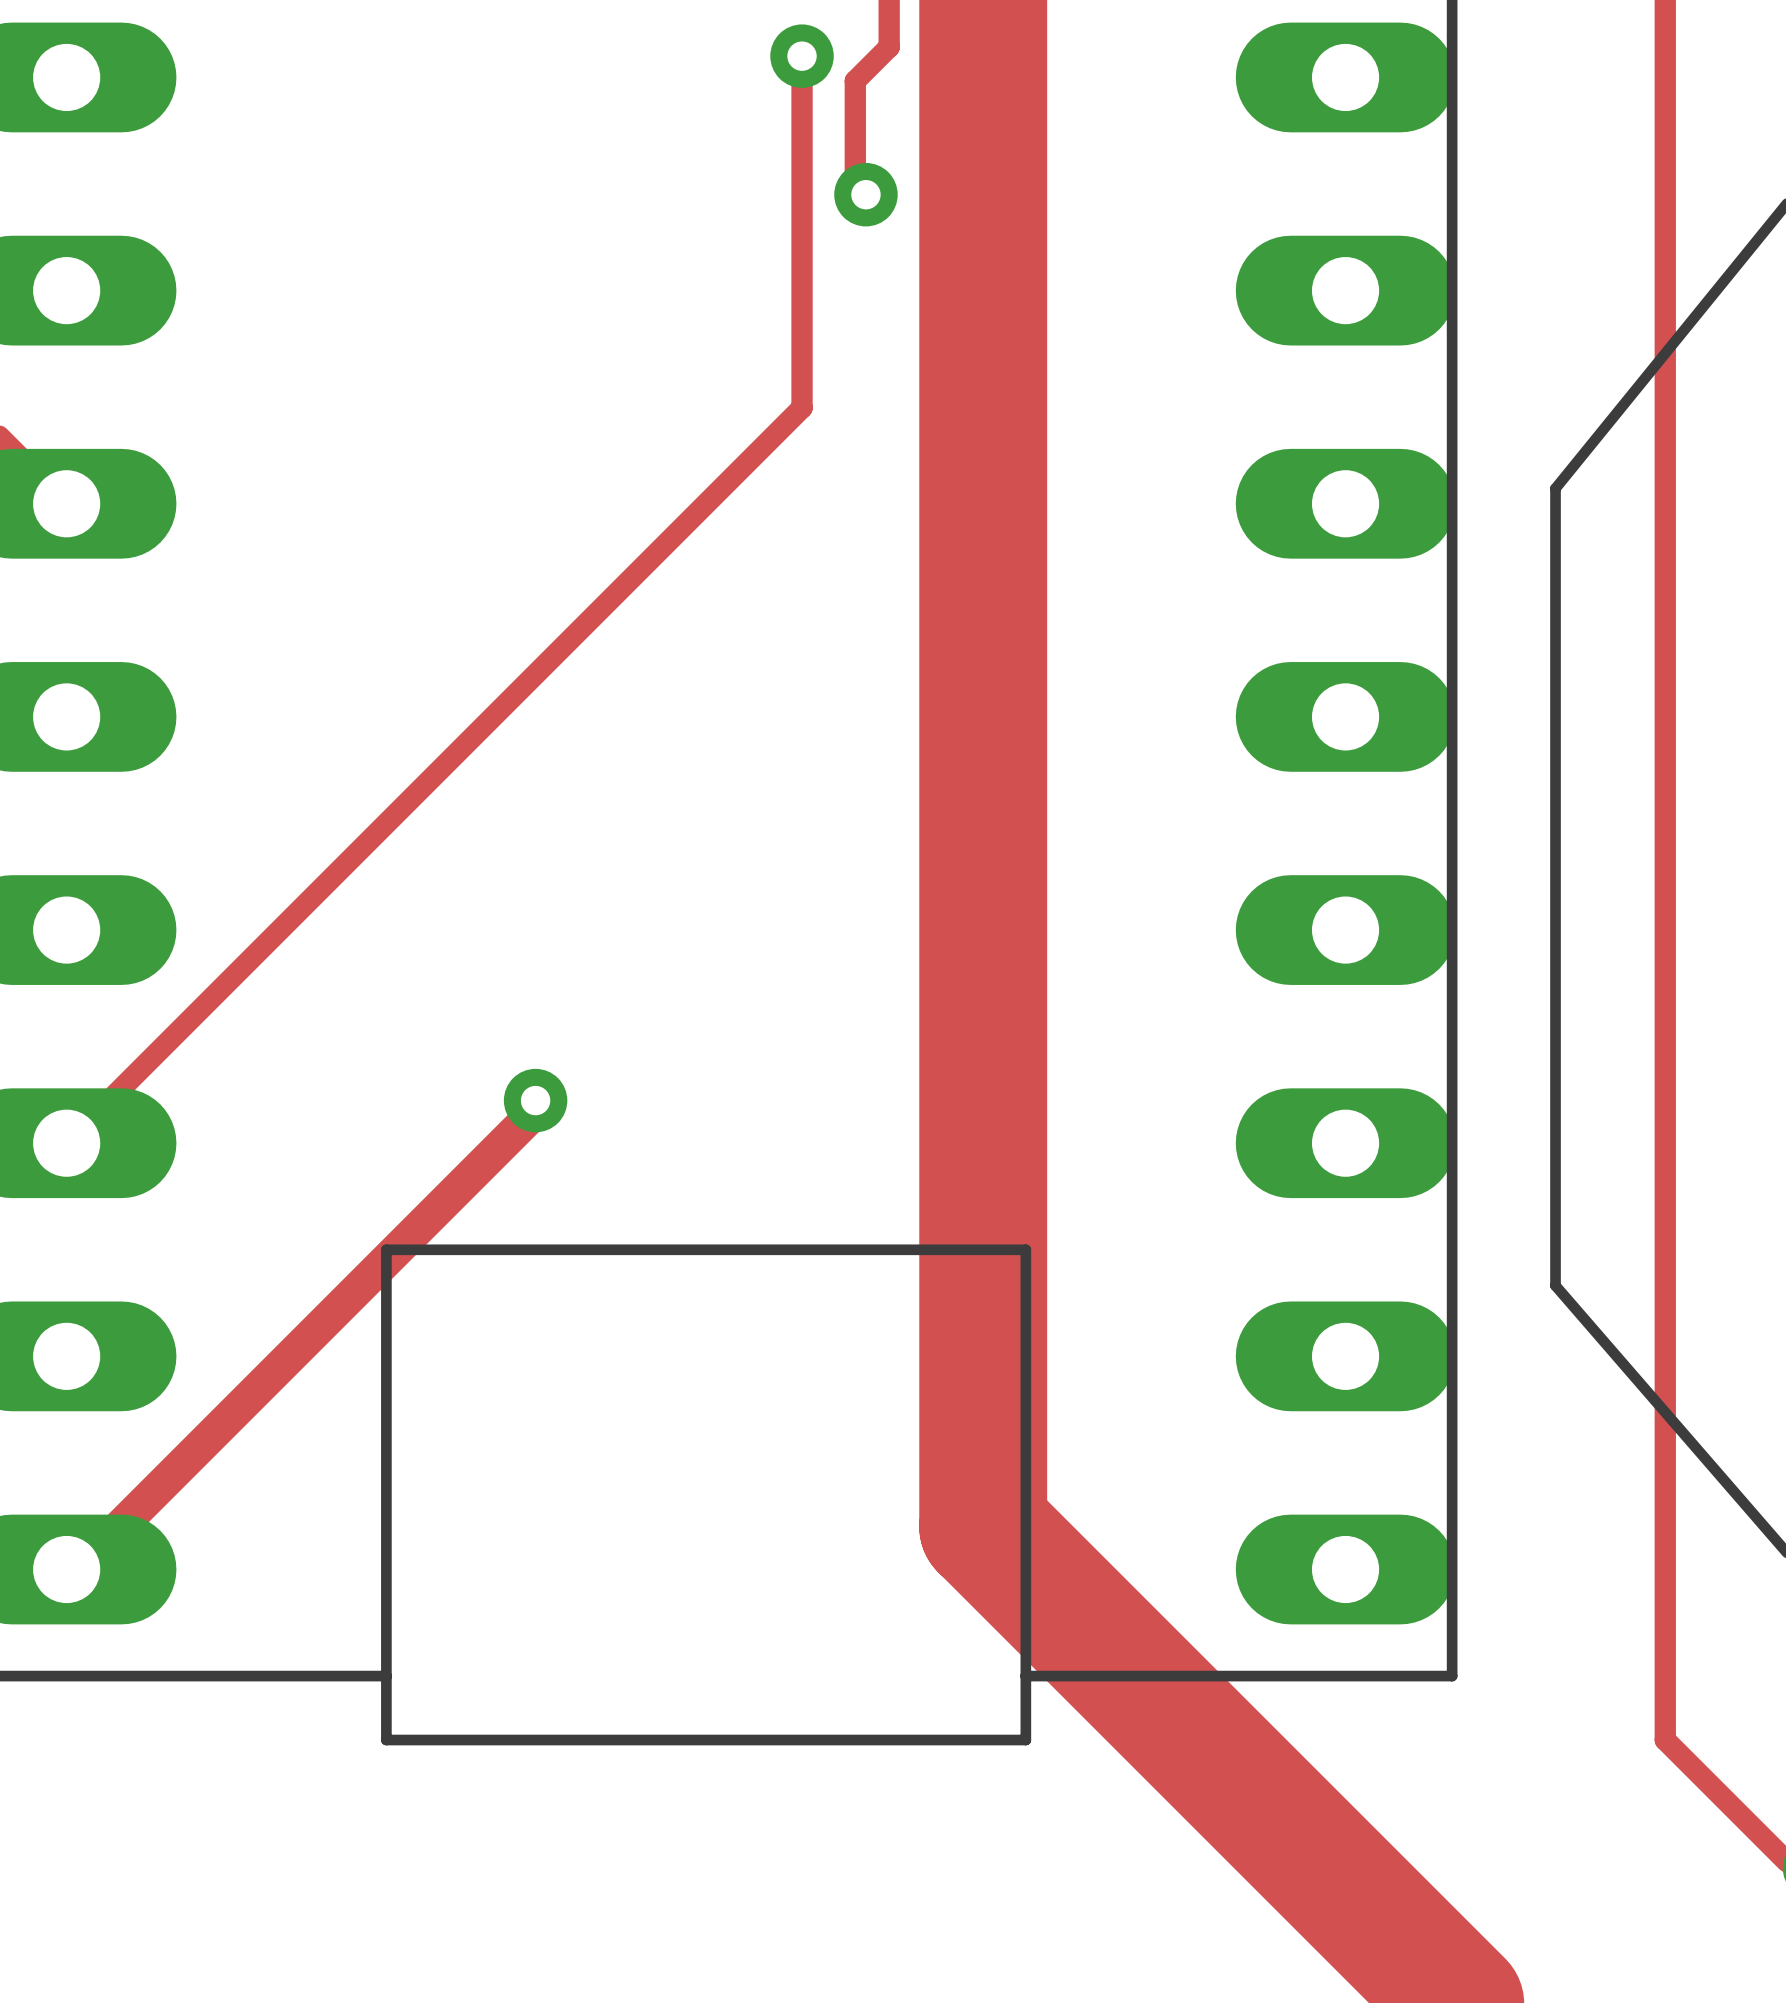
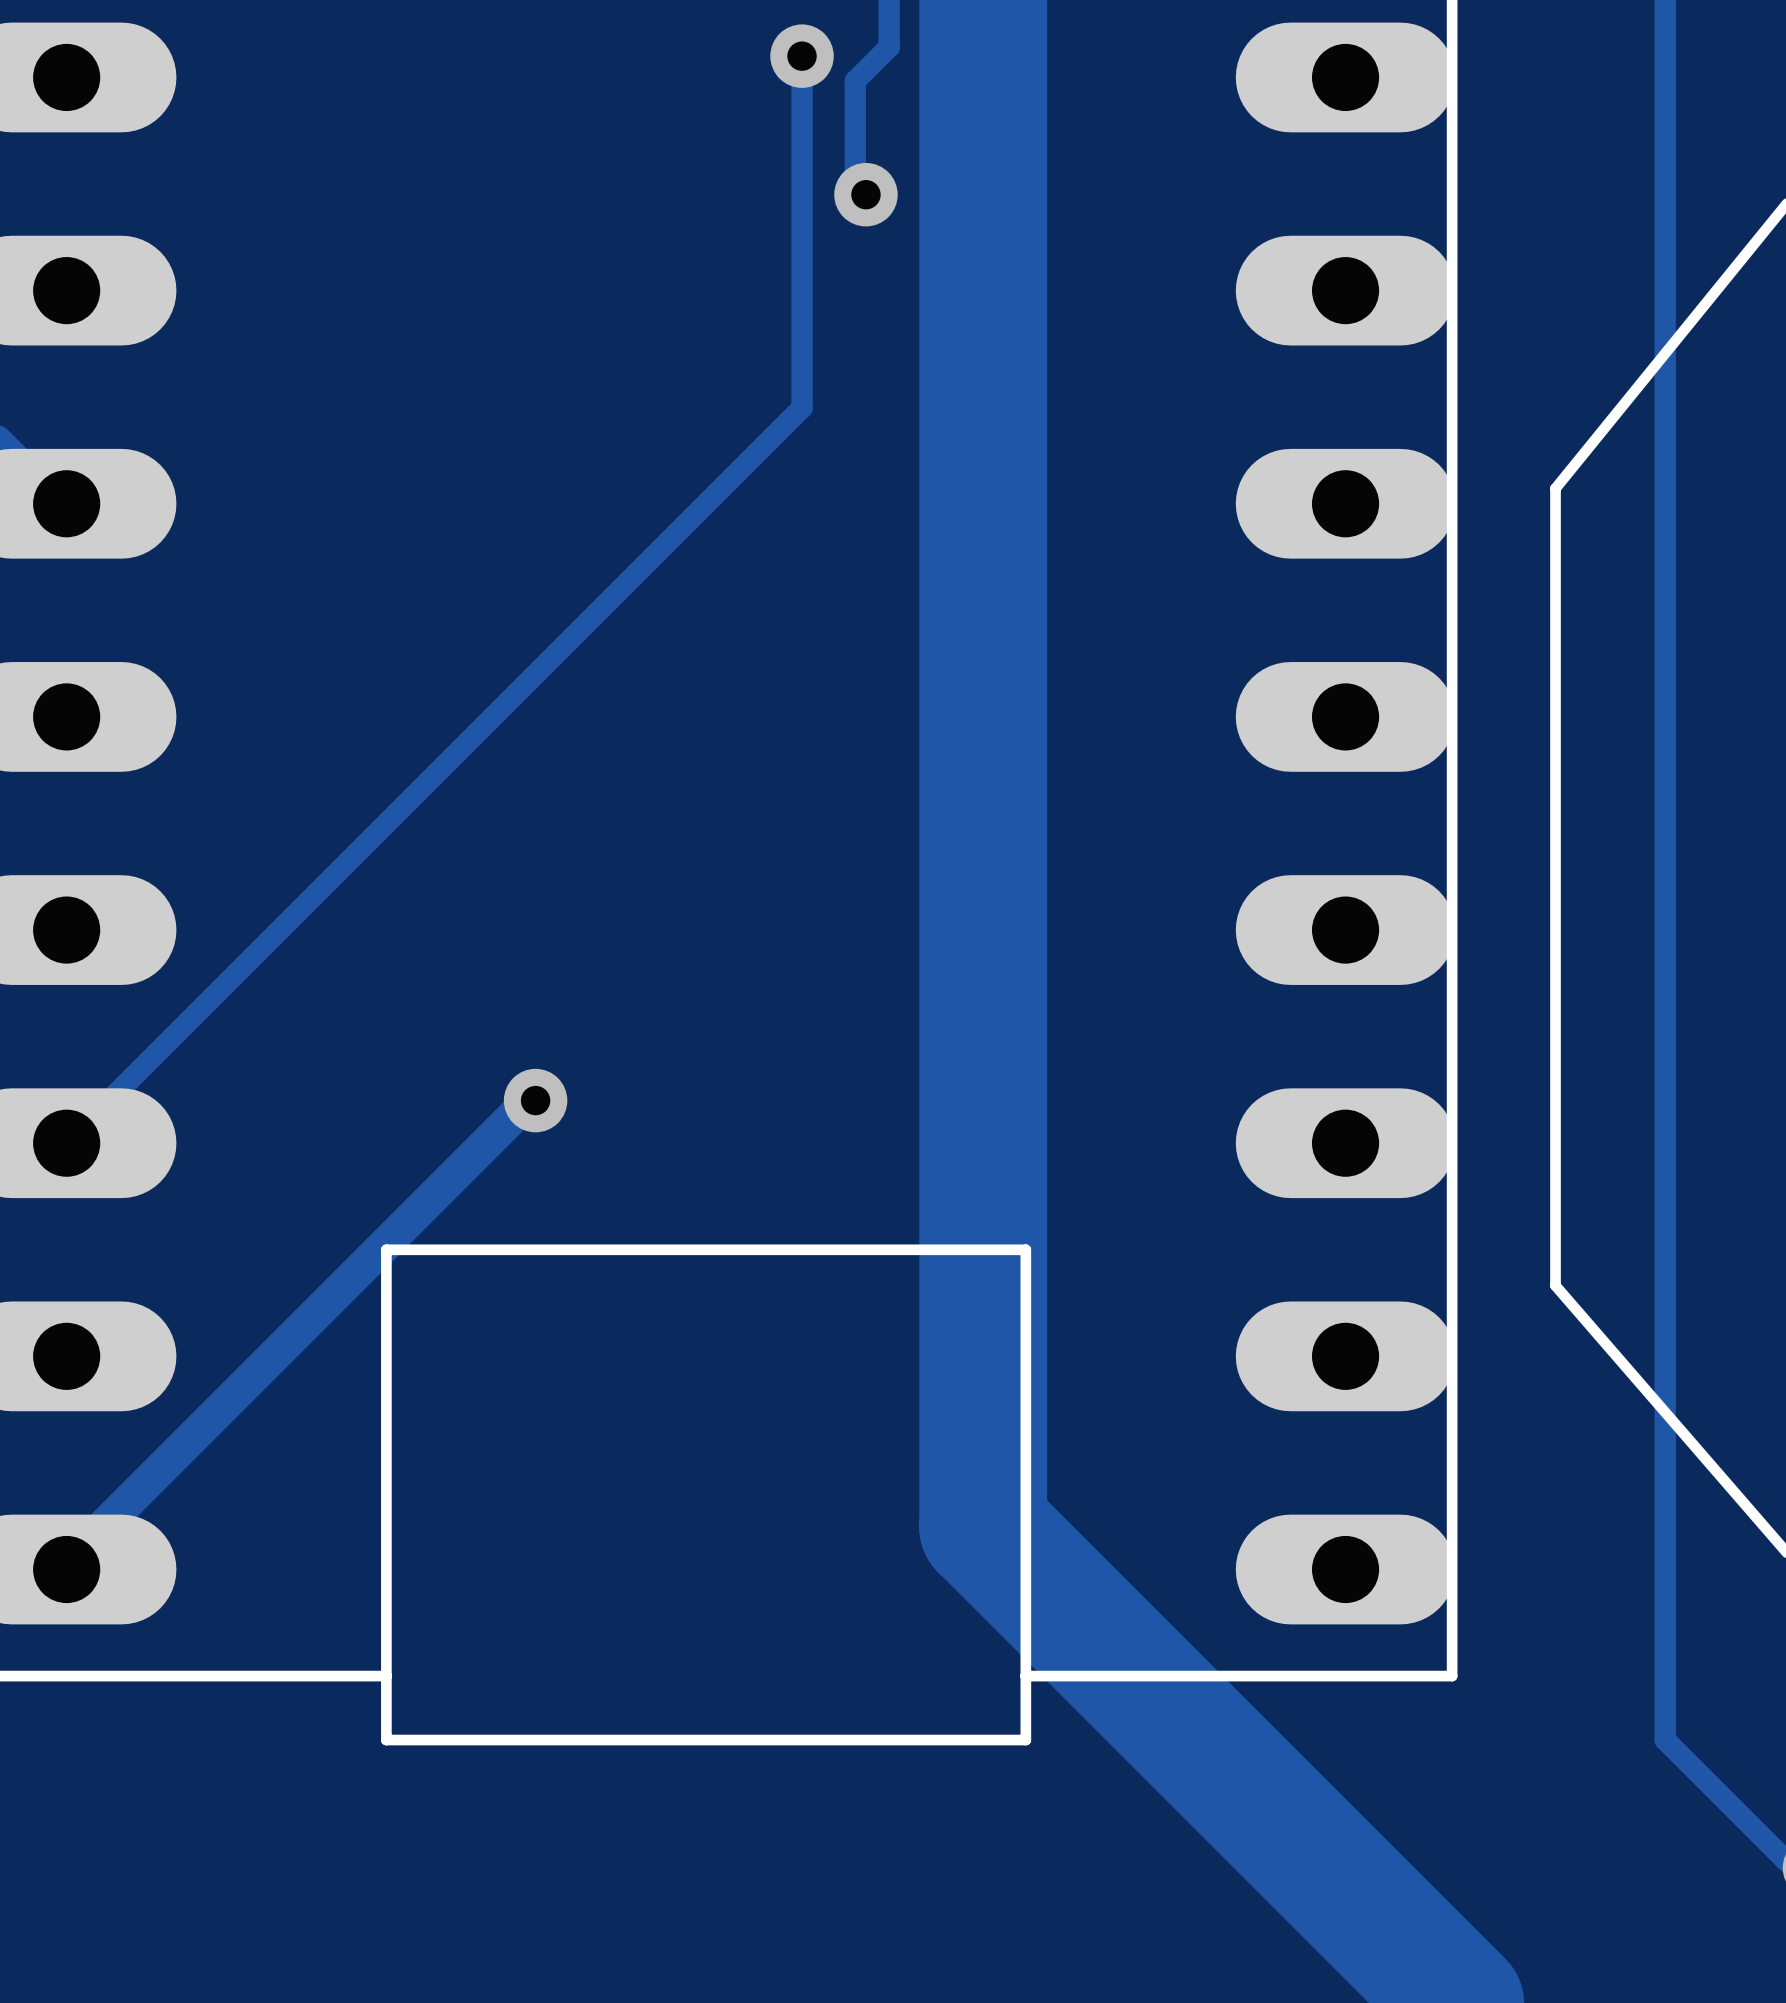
track: (535, 1100) (535, 1111) (77, 1569) (66, 1569) -> (537, 1092) (66, 1563) (66, 1569)

